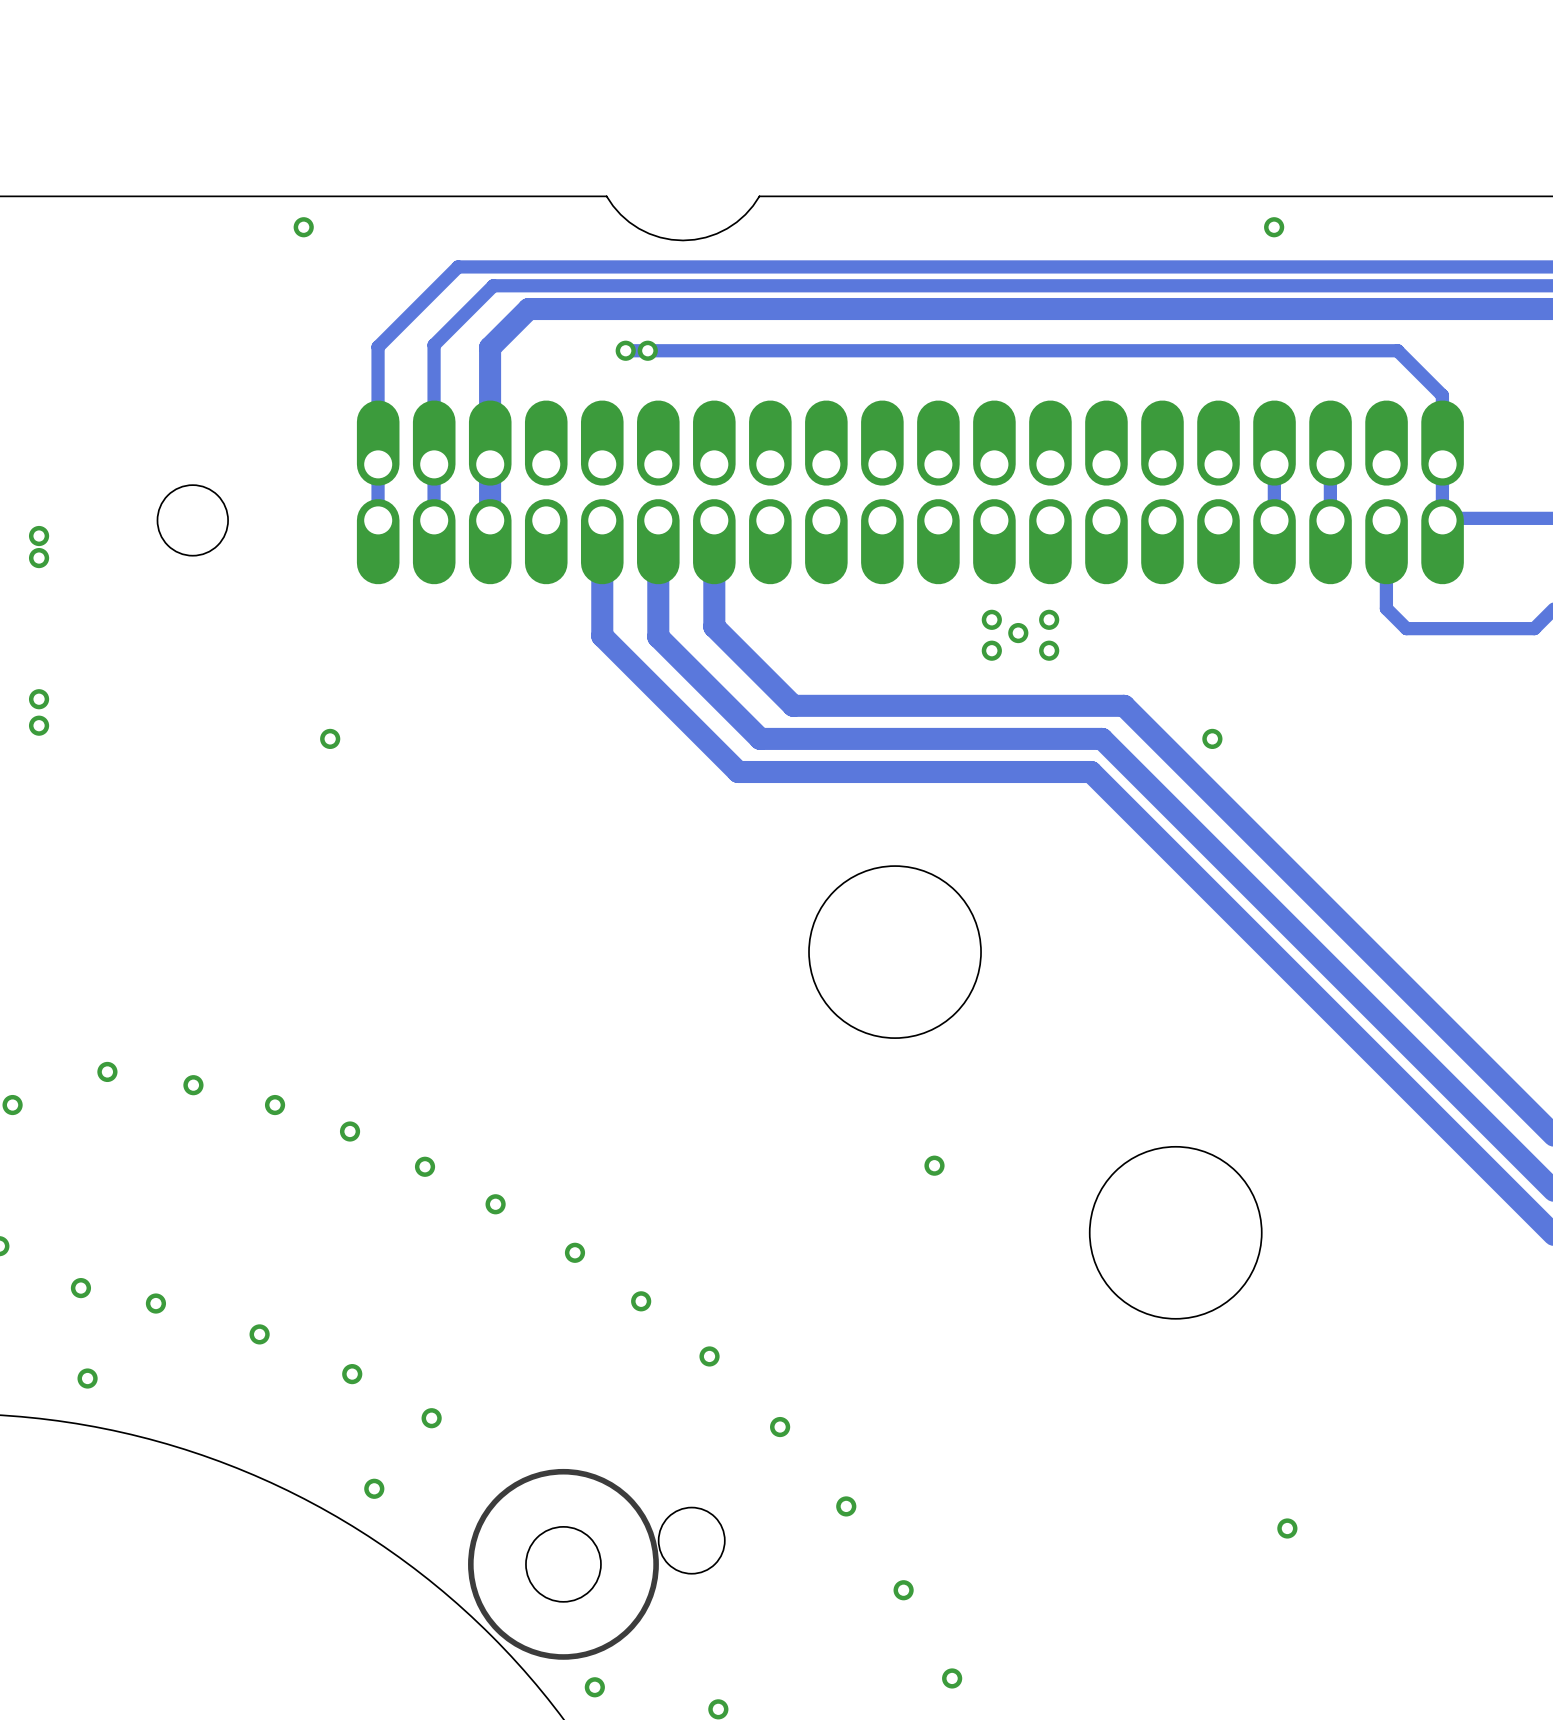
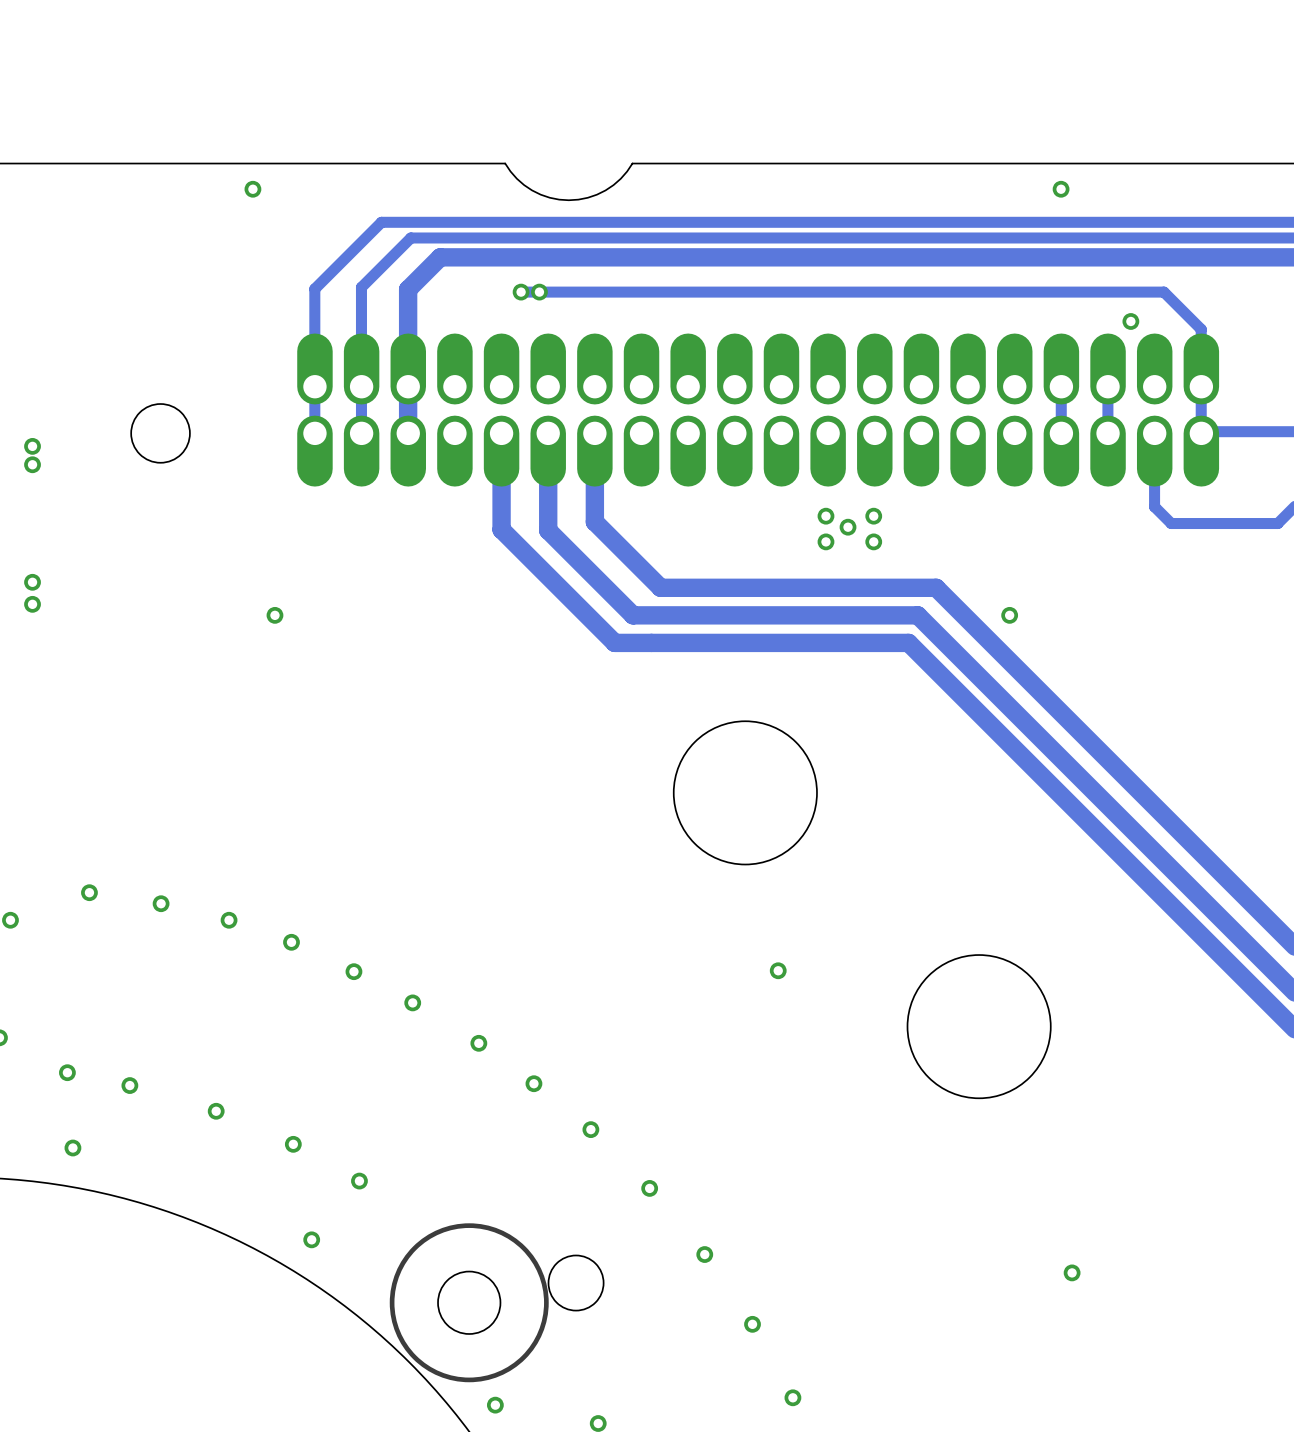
via: none -> (1130, 321)

